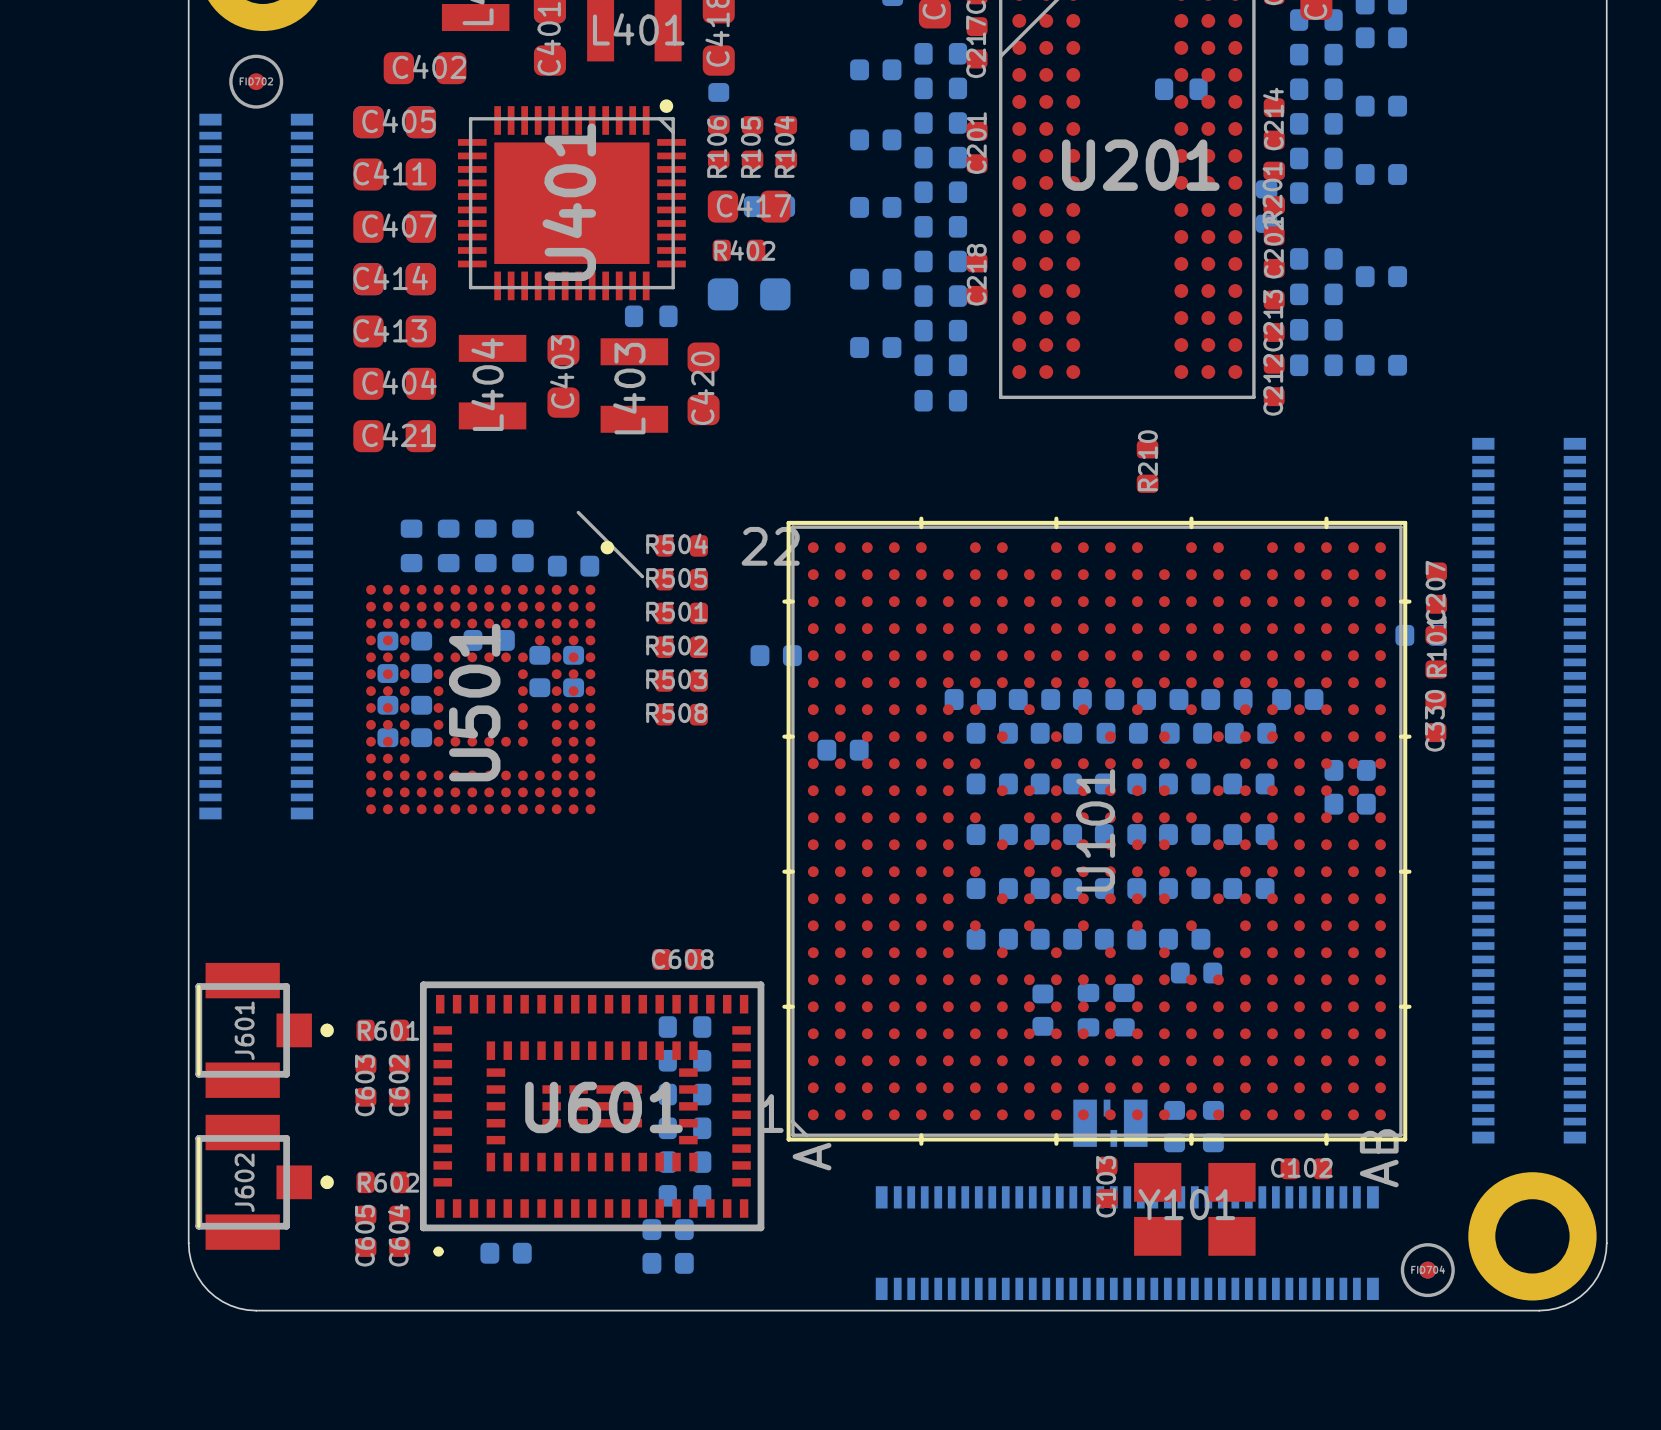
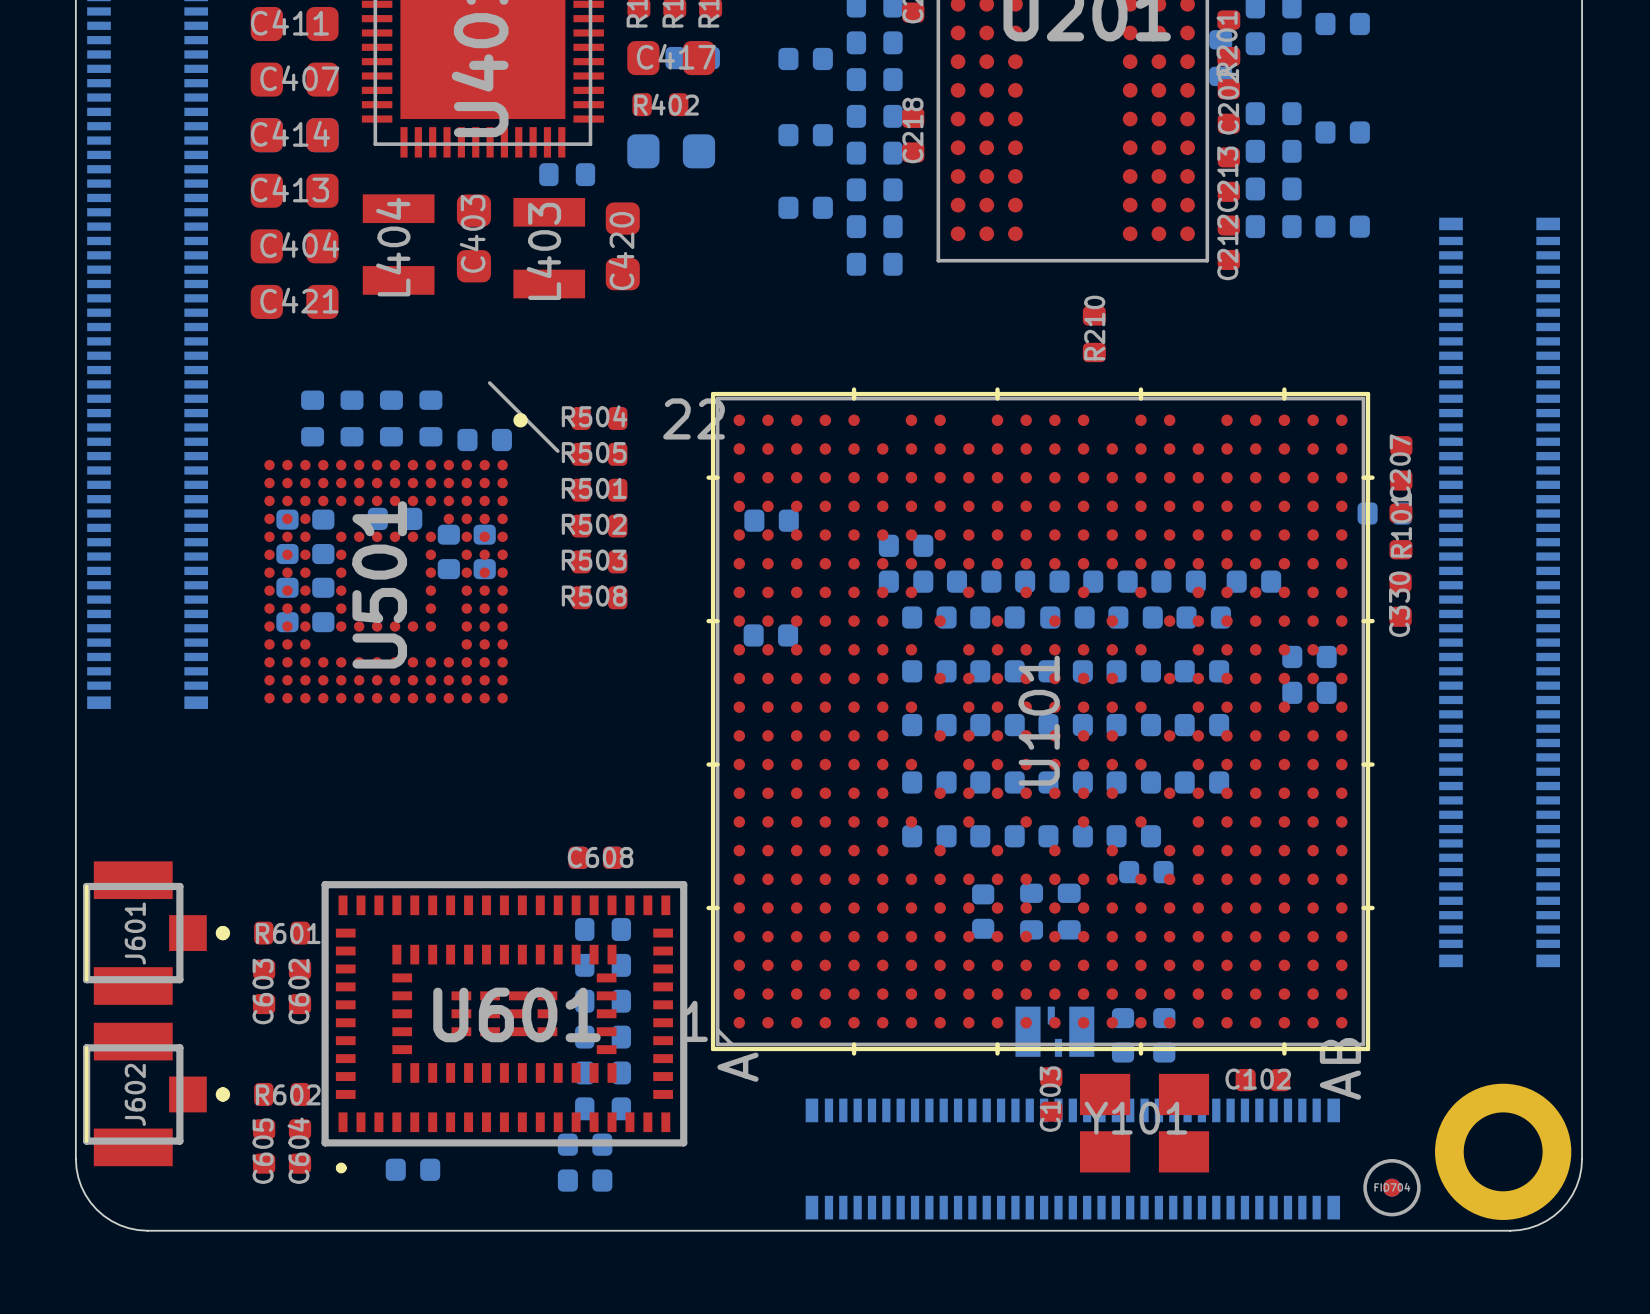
part position: (776, 655) -> (771, 520)
part: none -> (906, 545)
part position: (1529, 790) -> (1499, 592)

